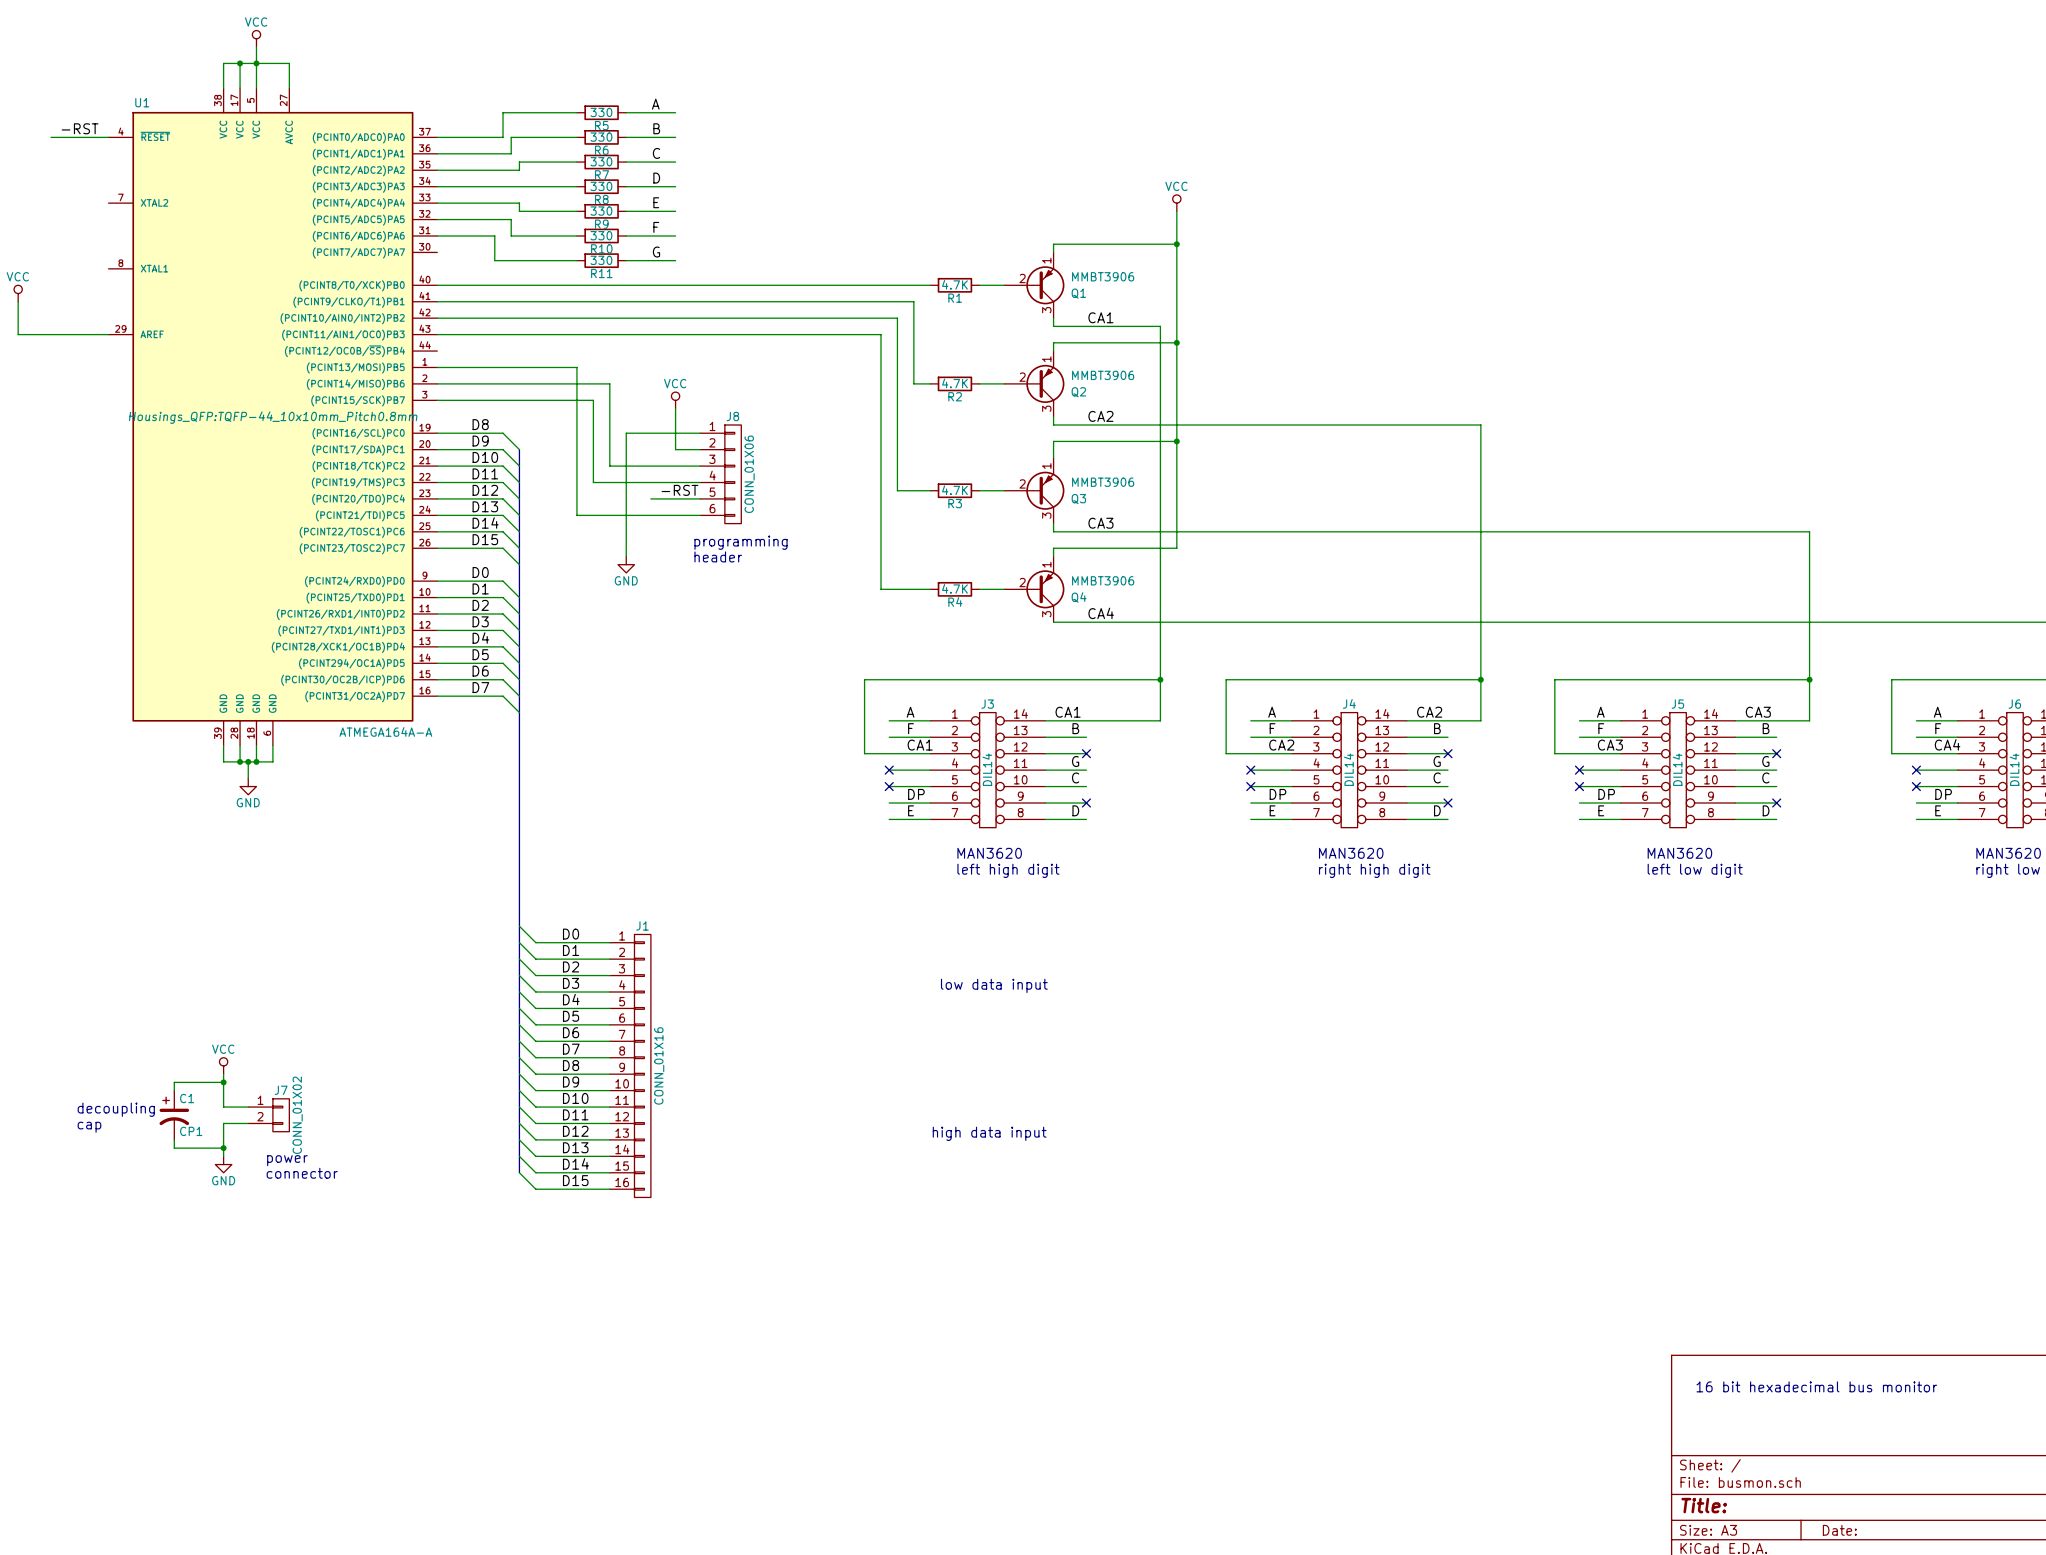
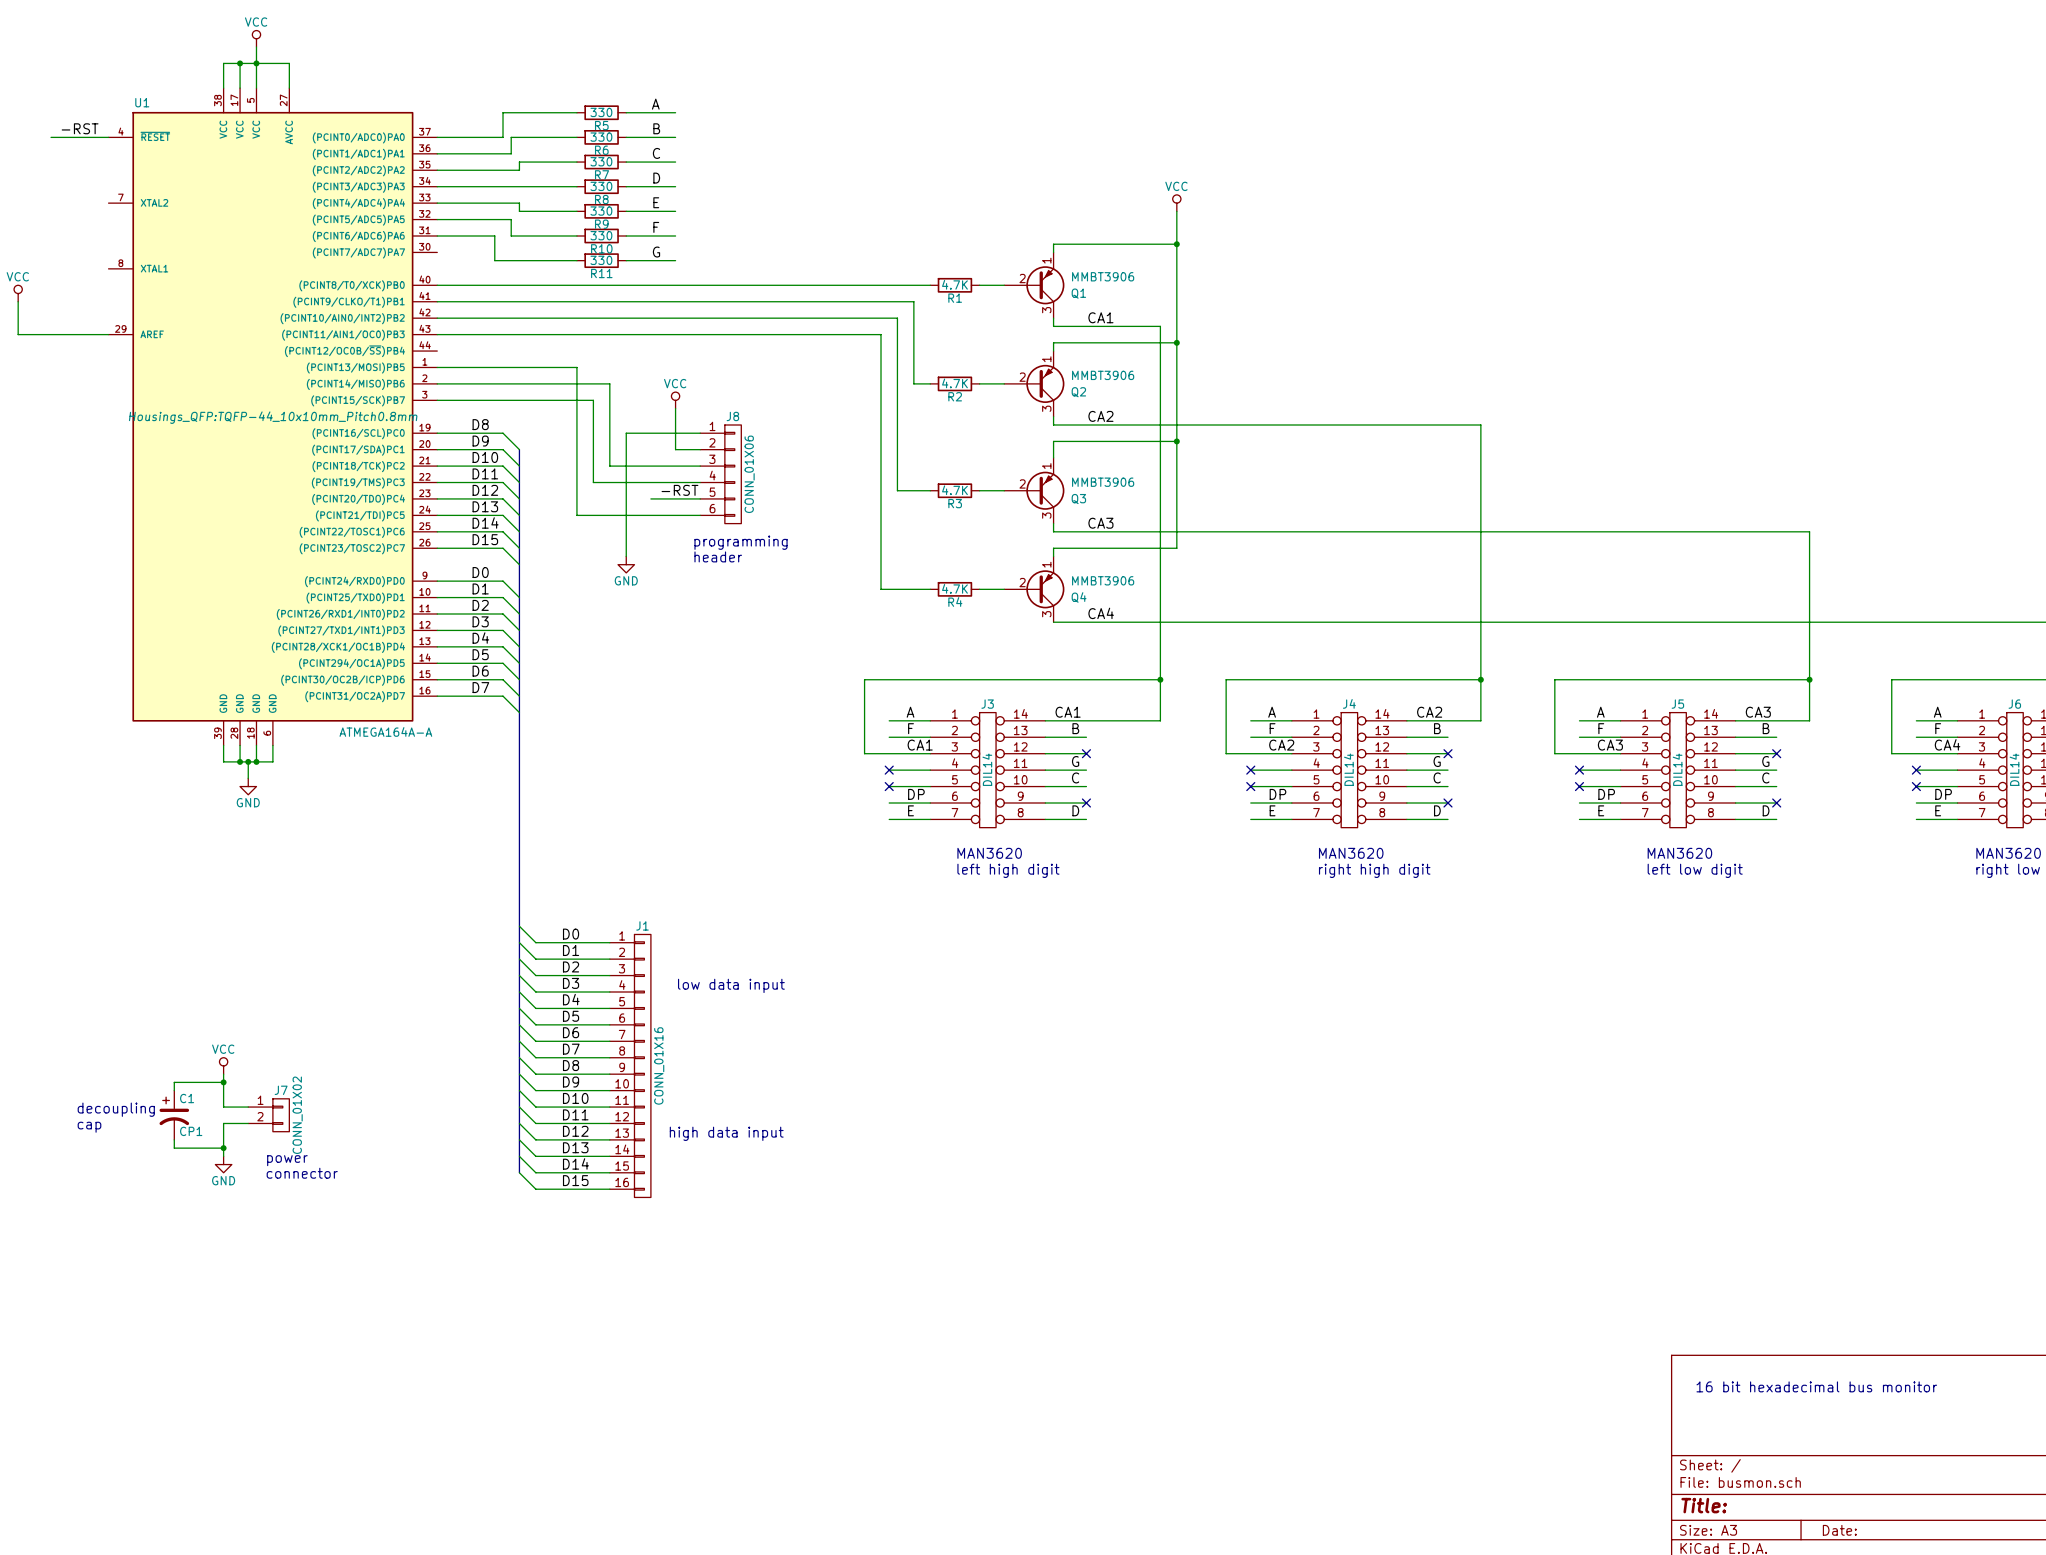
text: none -> low data input (731, 985)
text: low data input (994, 985) -> none
text: none -> high data input (726, 1133)
text: high data input (989, 1133) -> none

